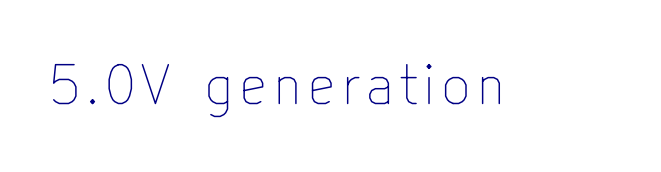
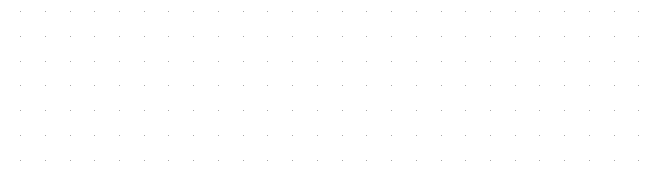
text: 5.0V generation (276, 90) -> none

